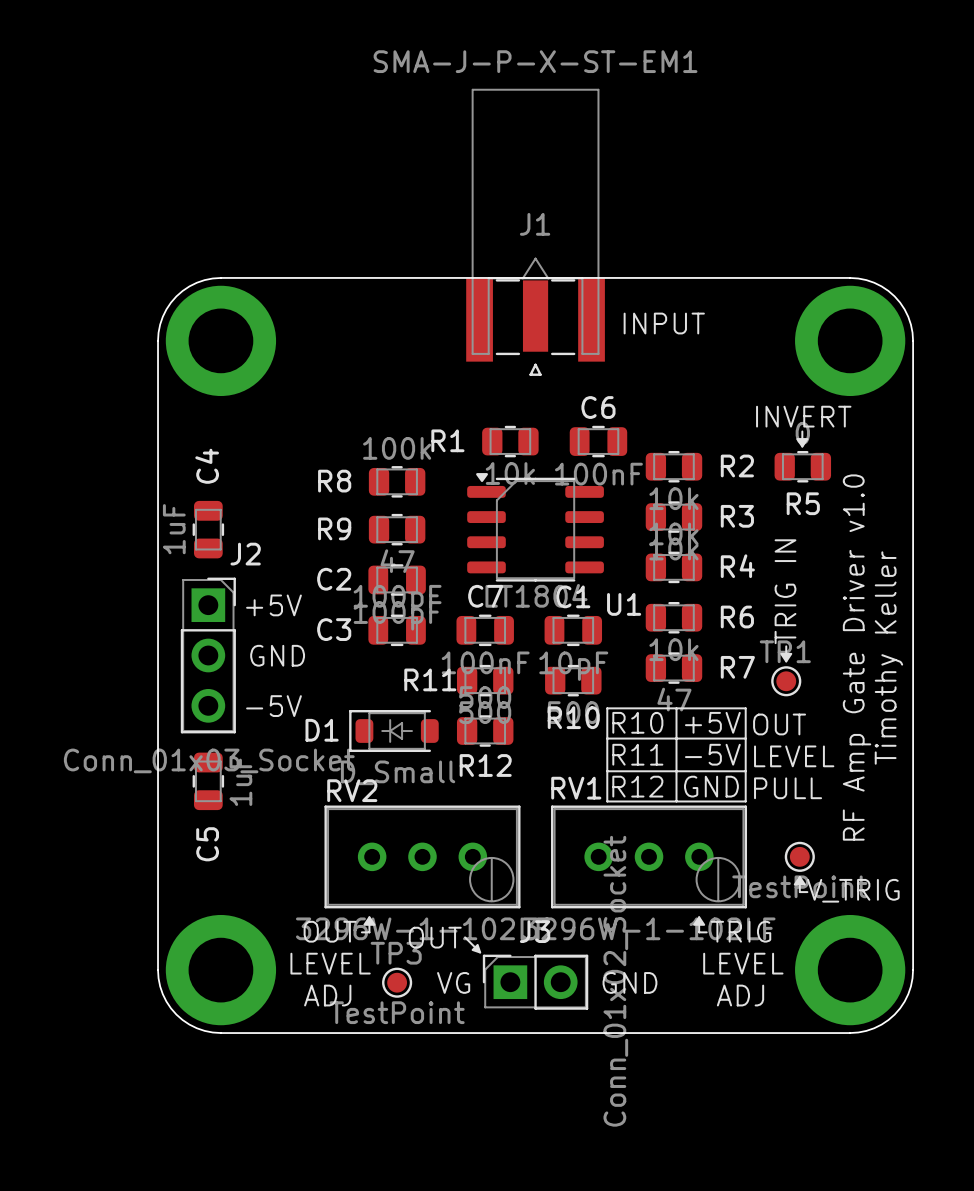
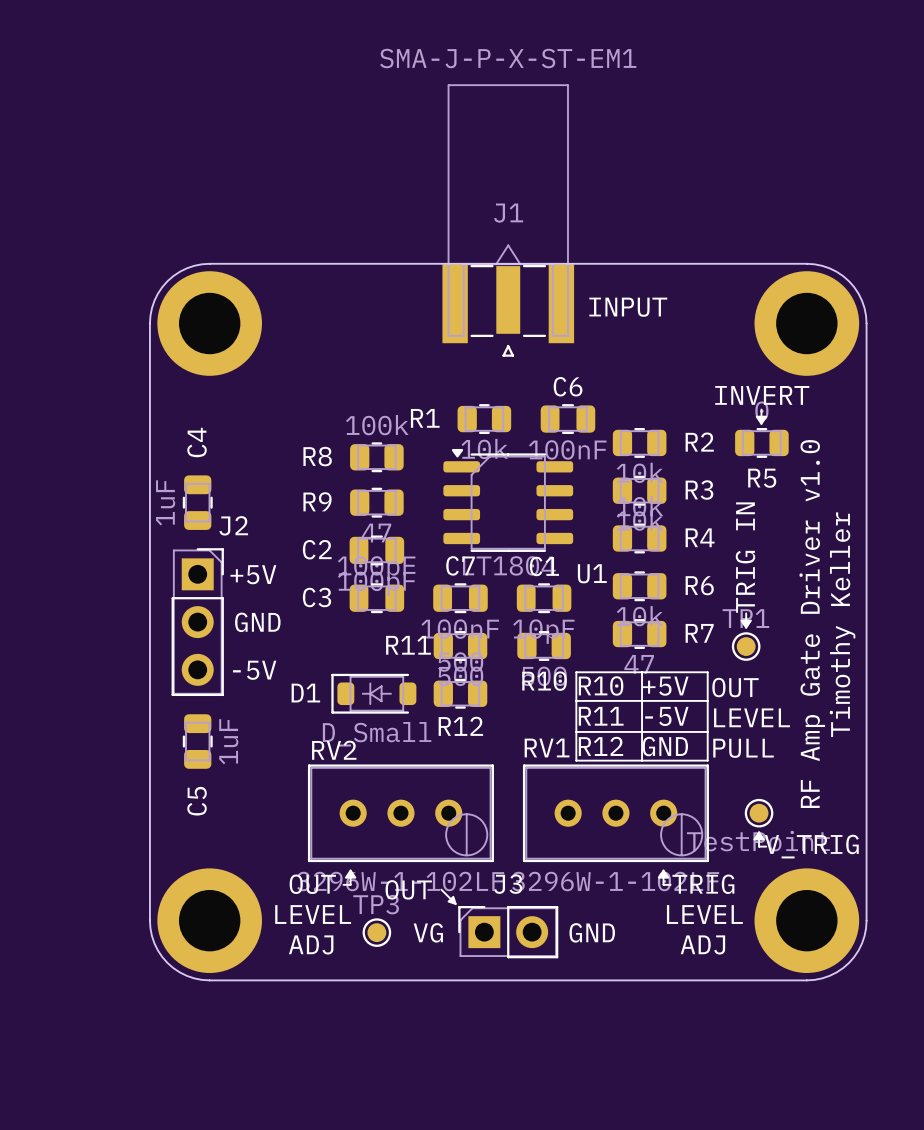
J2 value: Conn_01x03_Socket (209, 760) -> none
J3 value: Conn_01x02_Socket (615, 981) -> none
TP3 value: TestPoint (397, 1012) -> none

